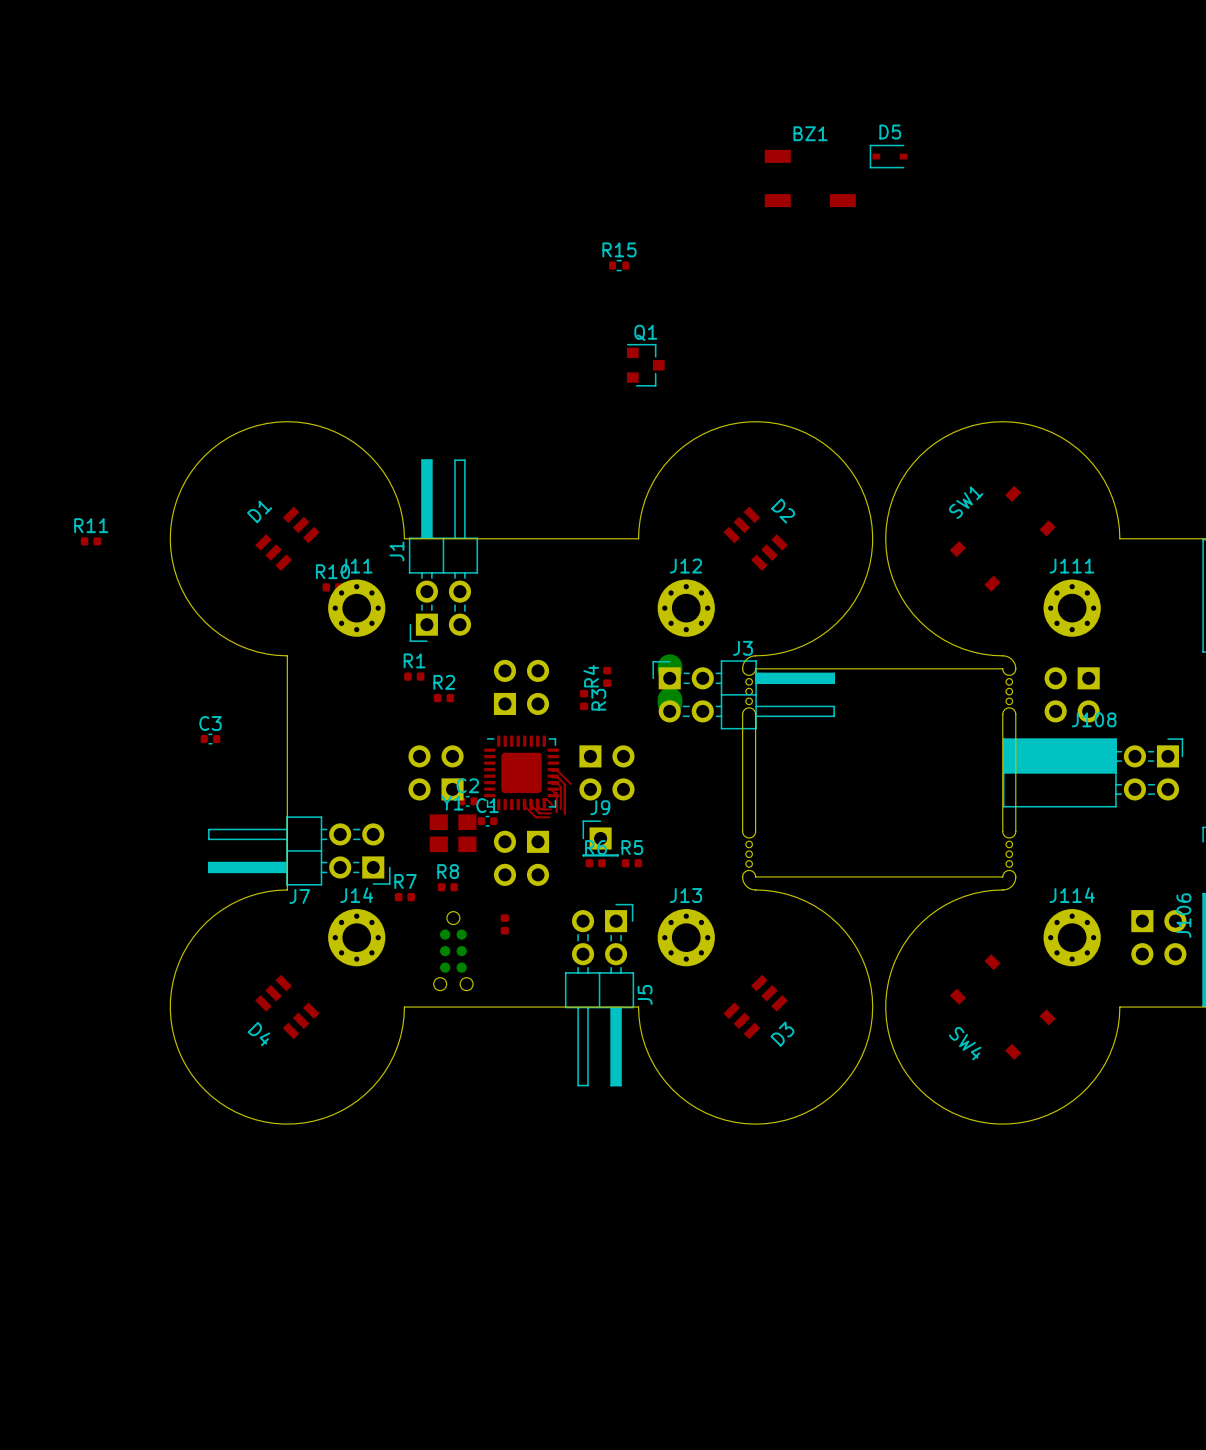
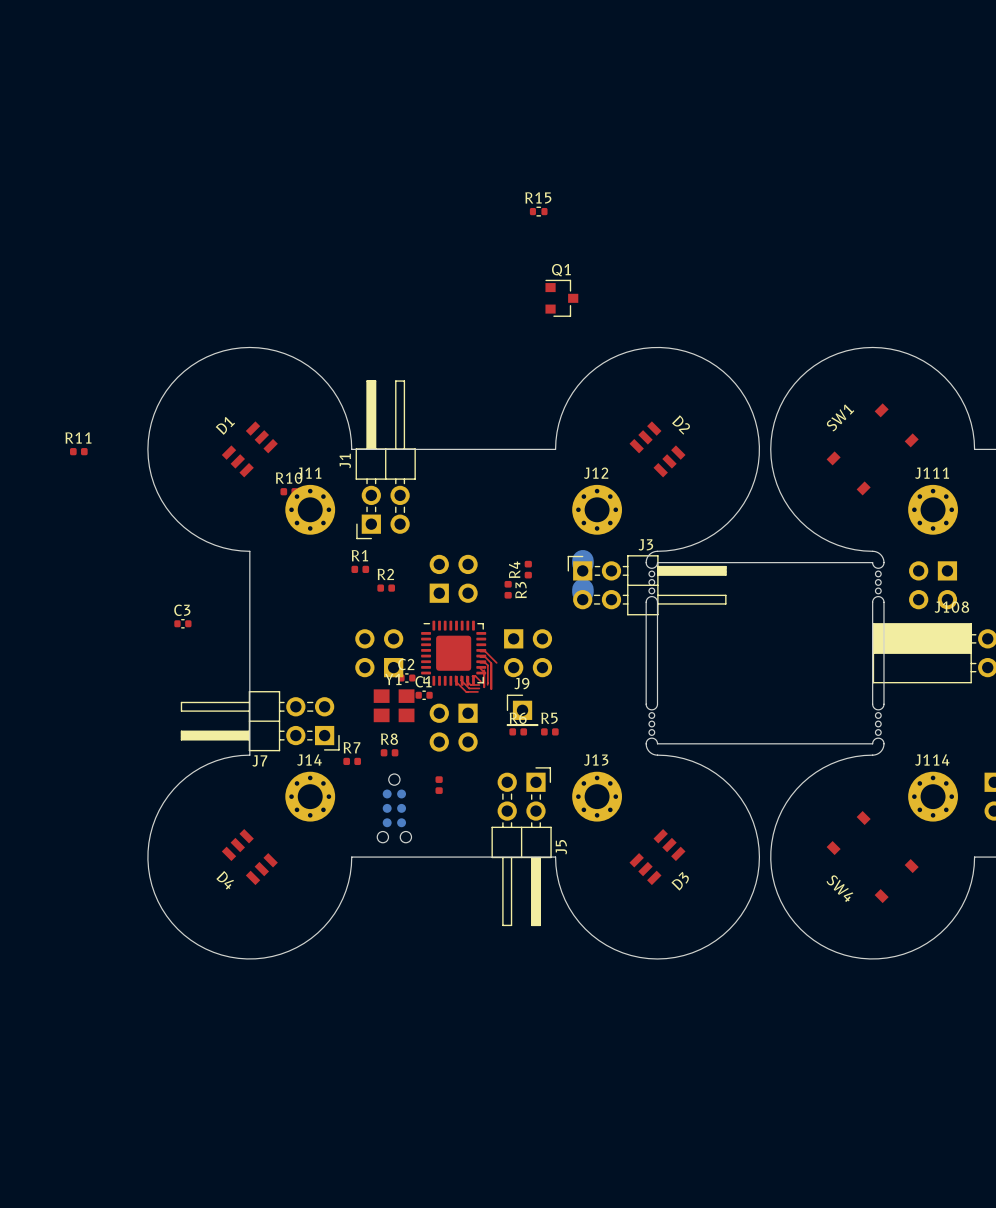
D5: (888, 156) -> none
BZ1: (810, 178) -> none

